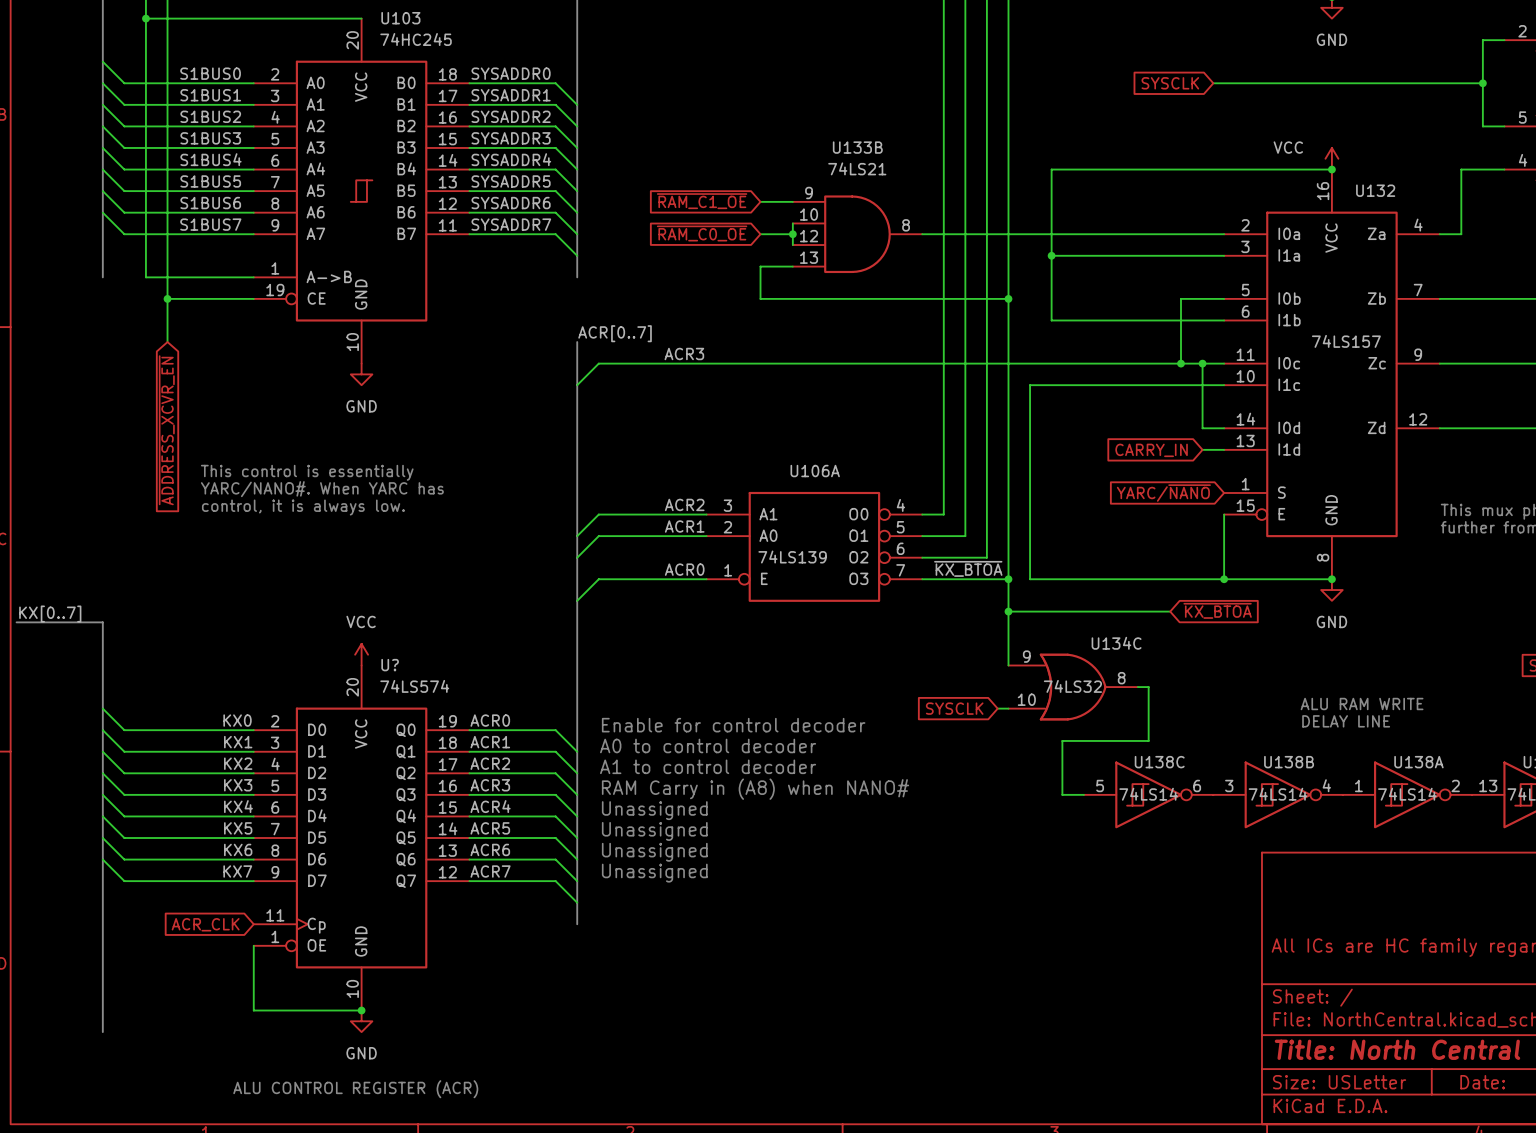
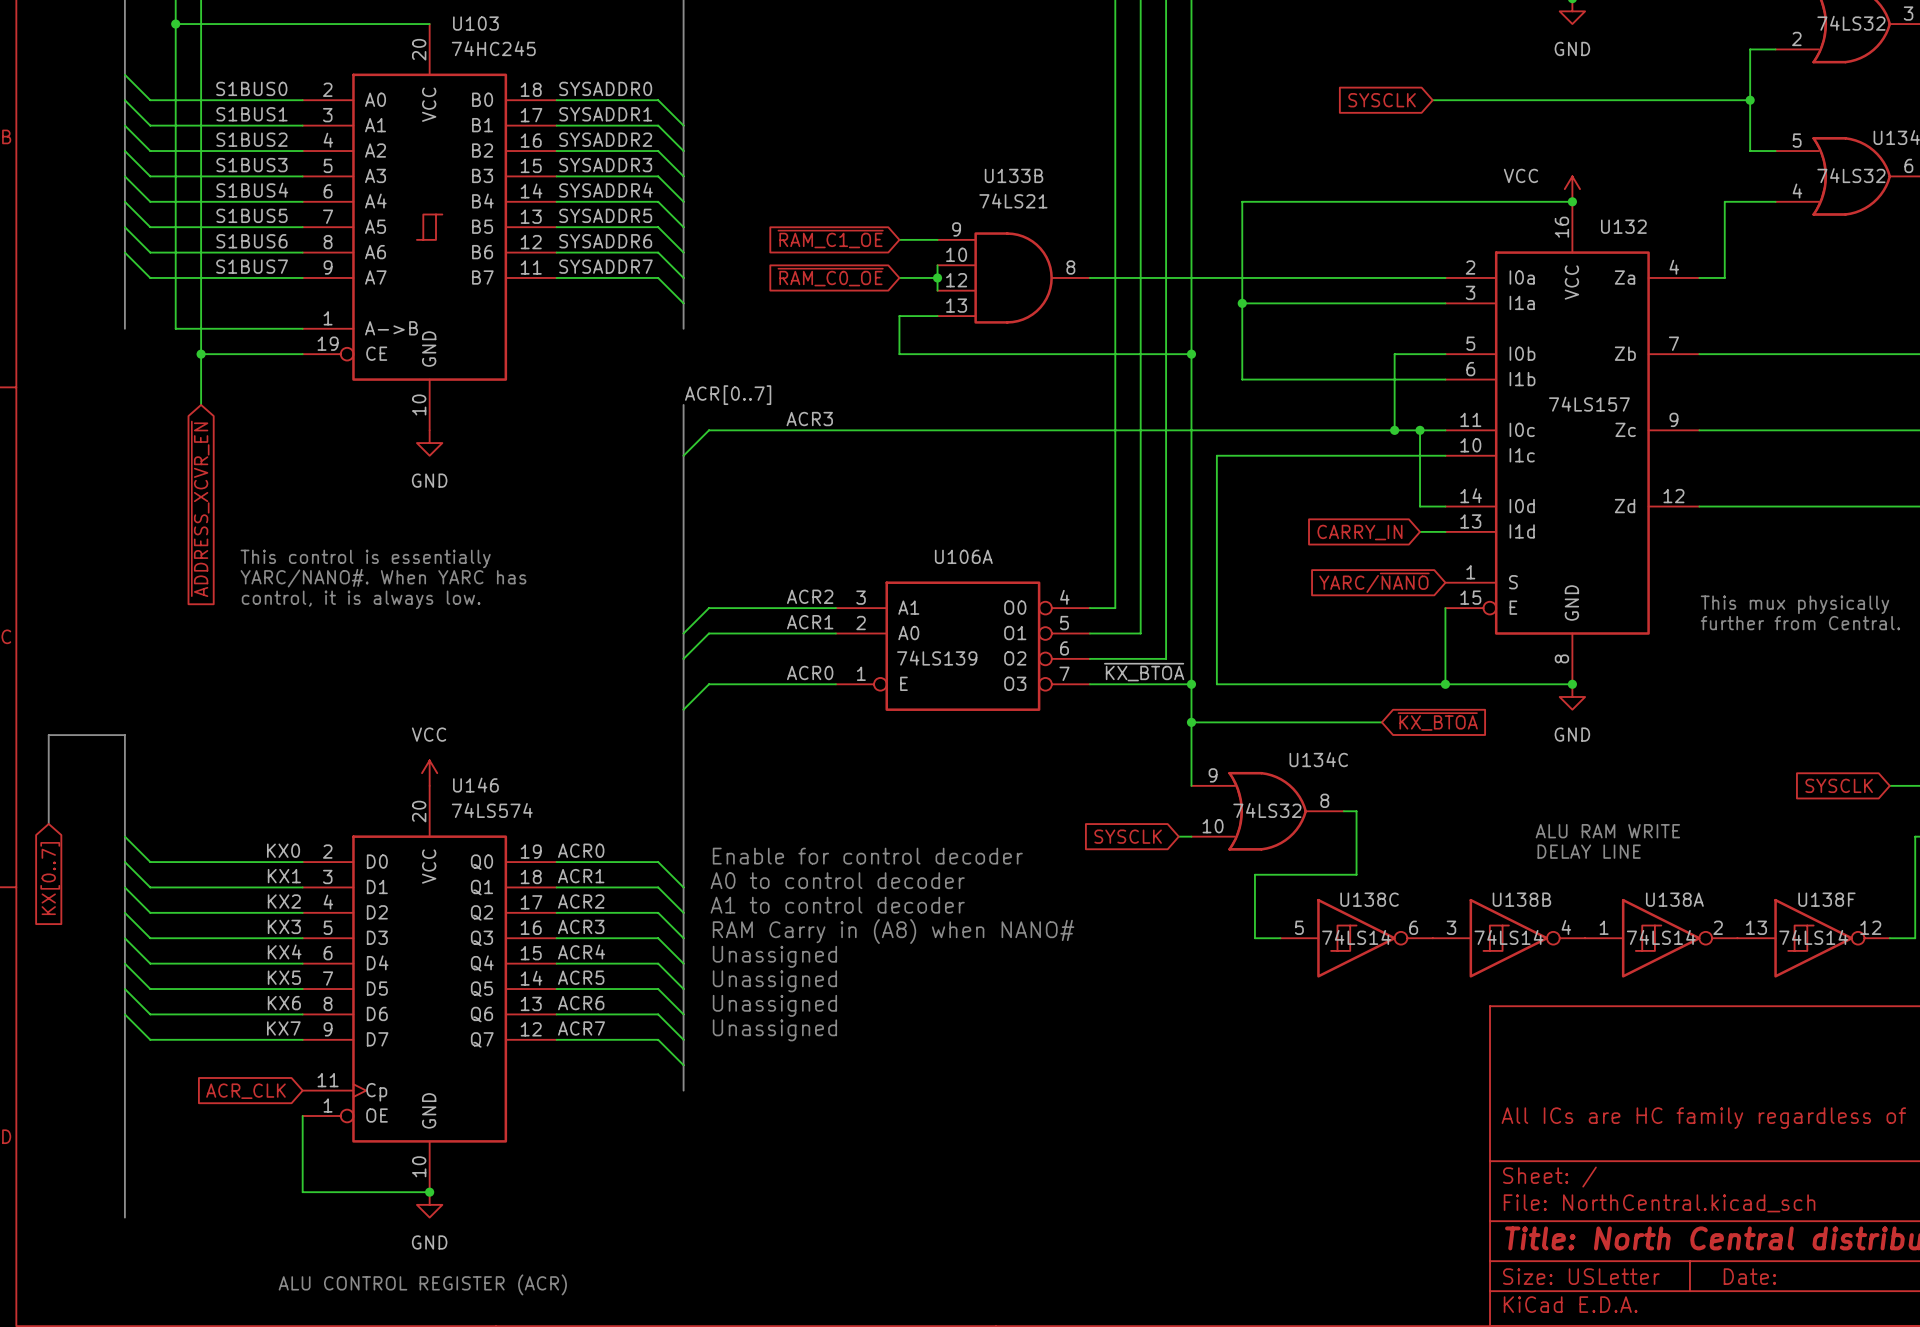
label: KX[0..7] (50, 614) -> none
bus: (16, 622) (38, 622) -> (48, 823) (48, 735)
U? name: U? (390, 665) -> U146 (475, 785)
global label: none -> KX[0..7] (50, 878)

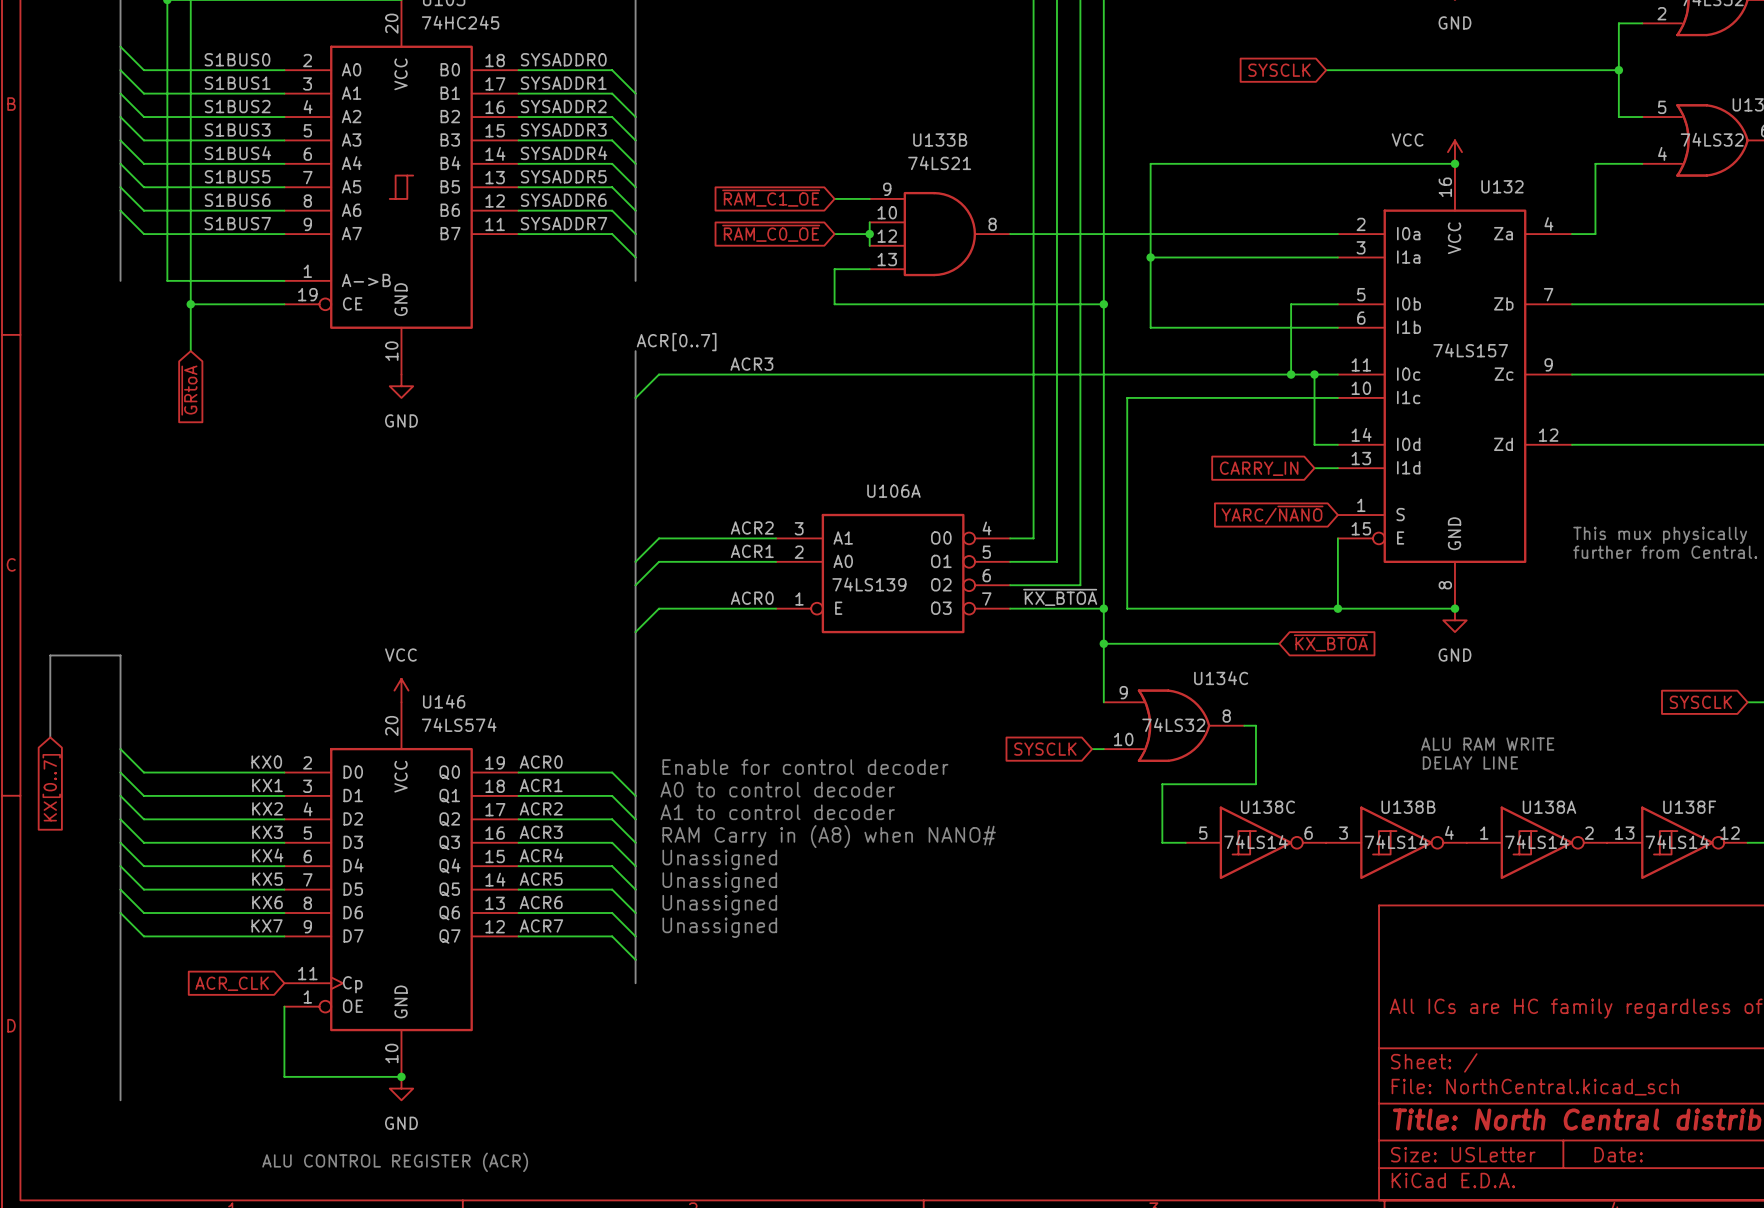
global label: ~{ADDRESS_XCVR_EN} (200, 508) -> ~{GRtoA} (189, 390)
text: This control is essentially (365, 558) -> none
text: YARC/NANO#. When YARC has (383, 578) -> none
text: control, it is always low. (361, 599) -> none

